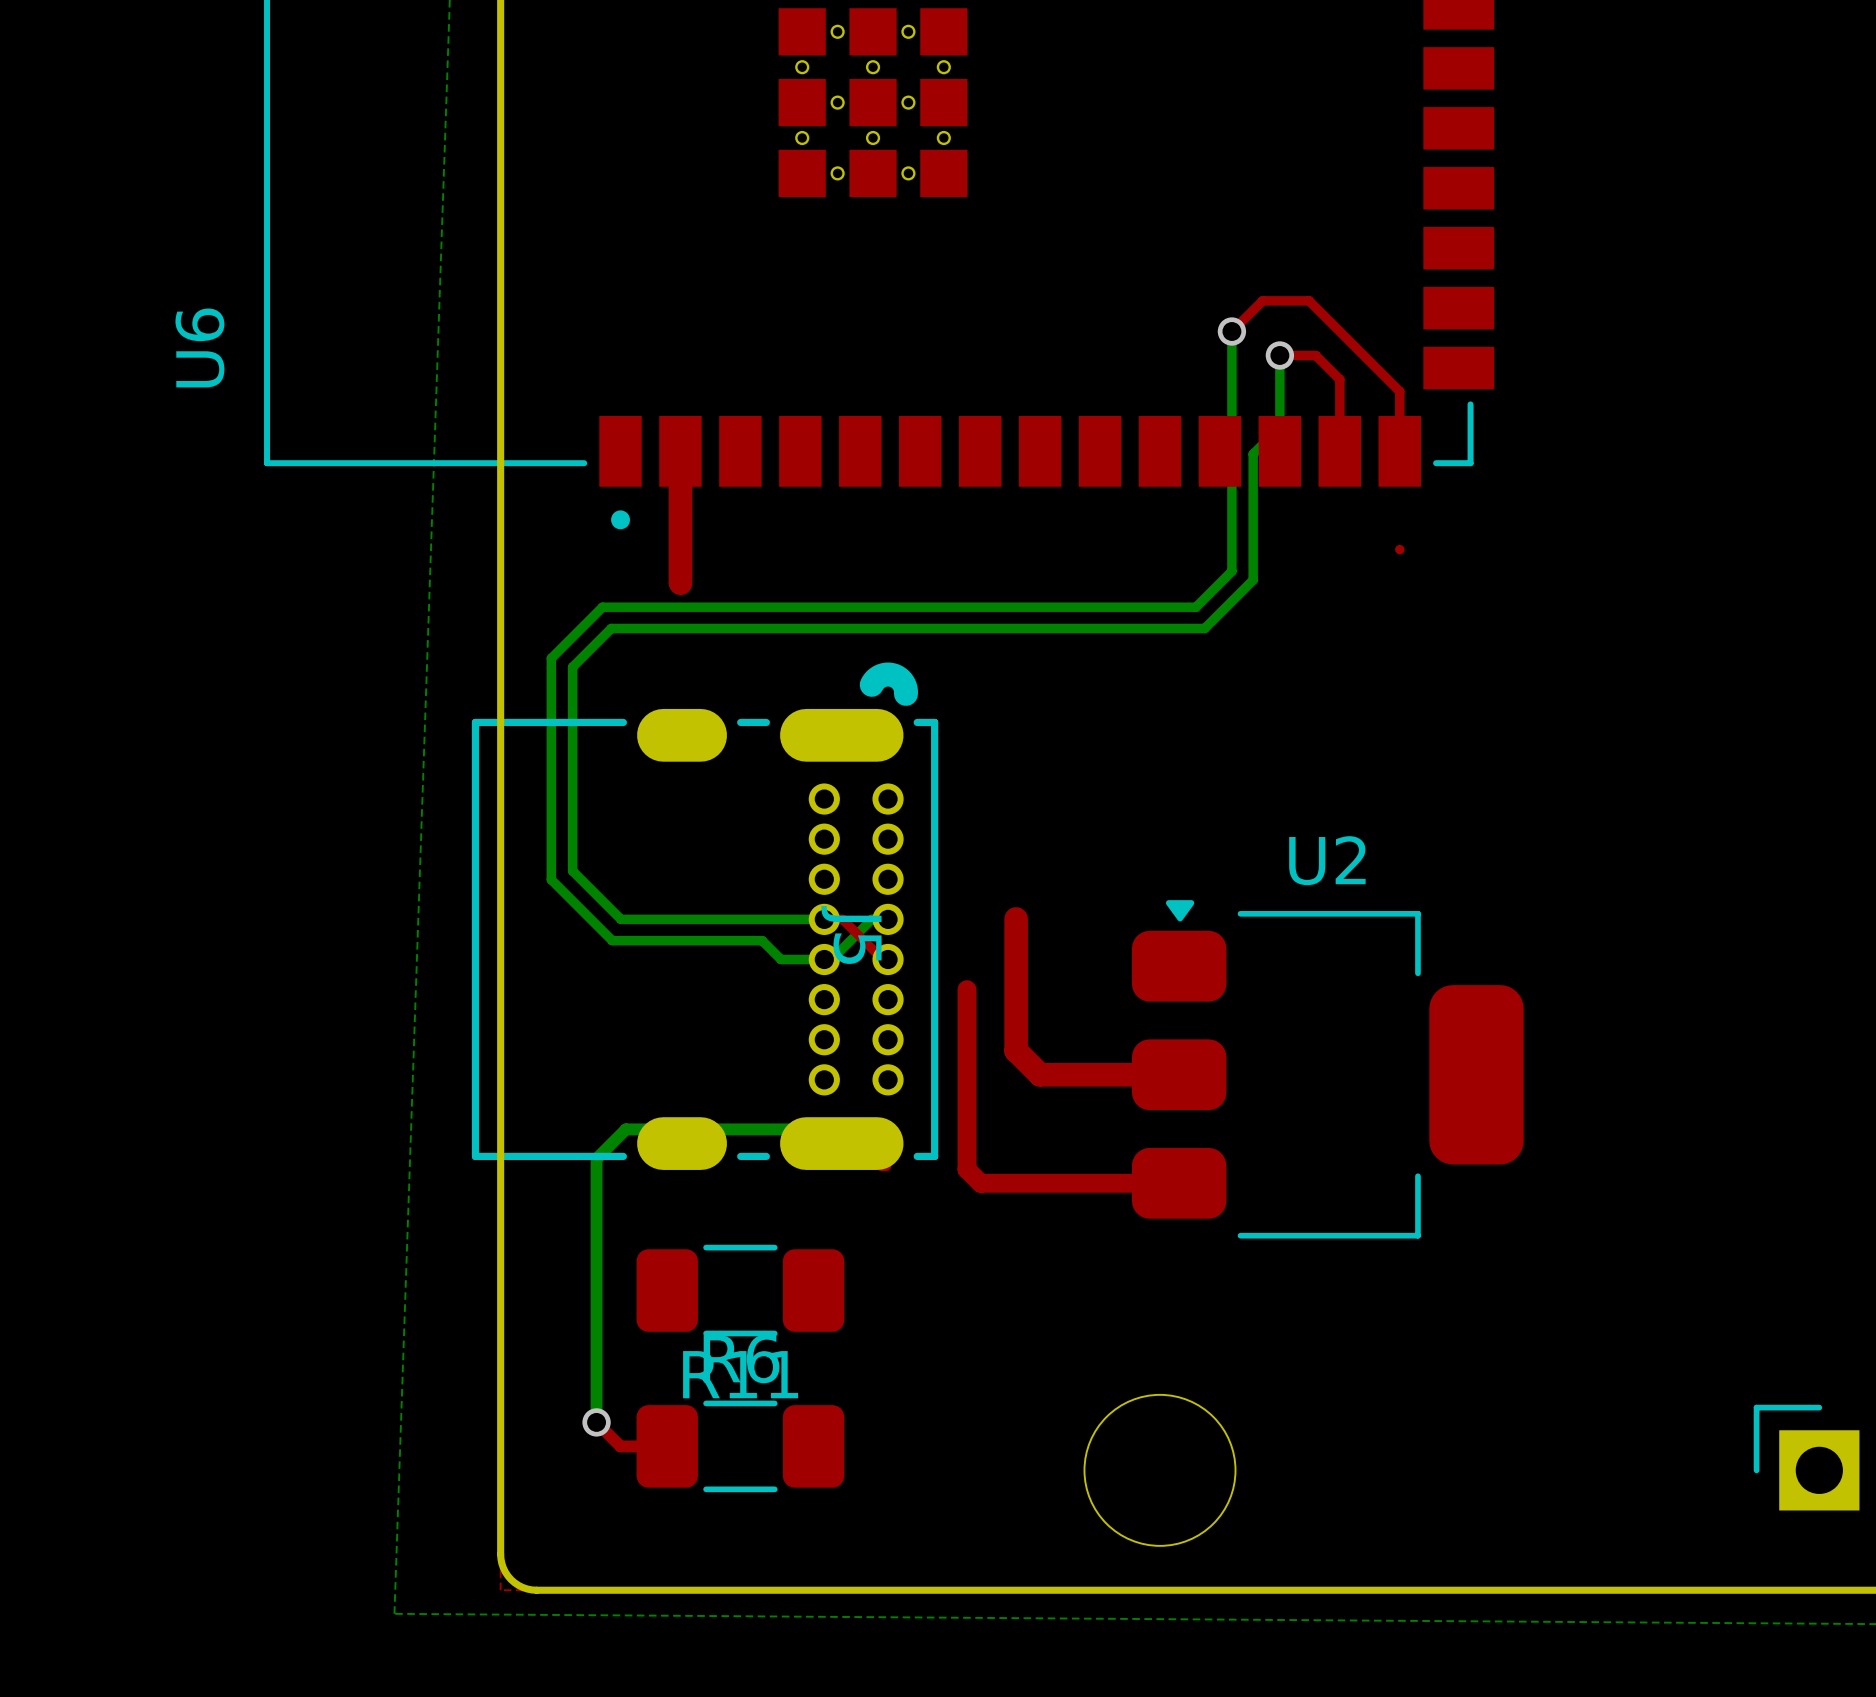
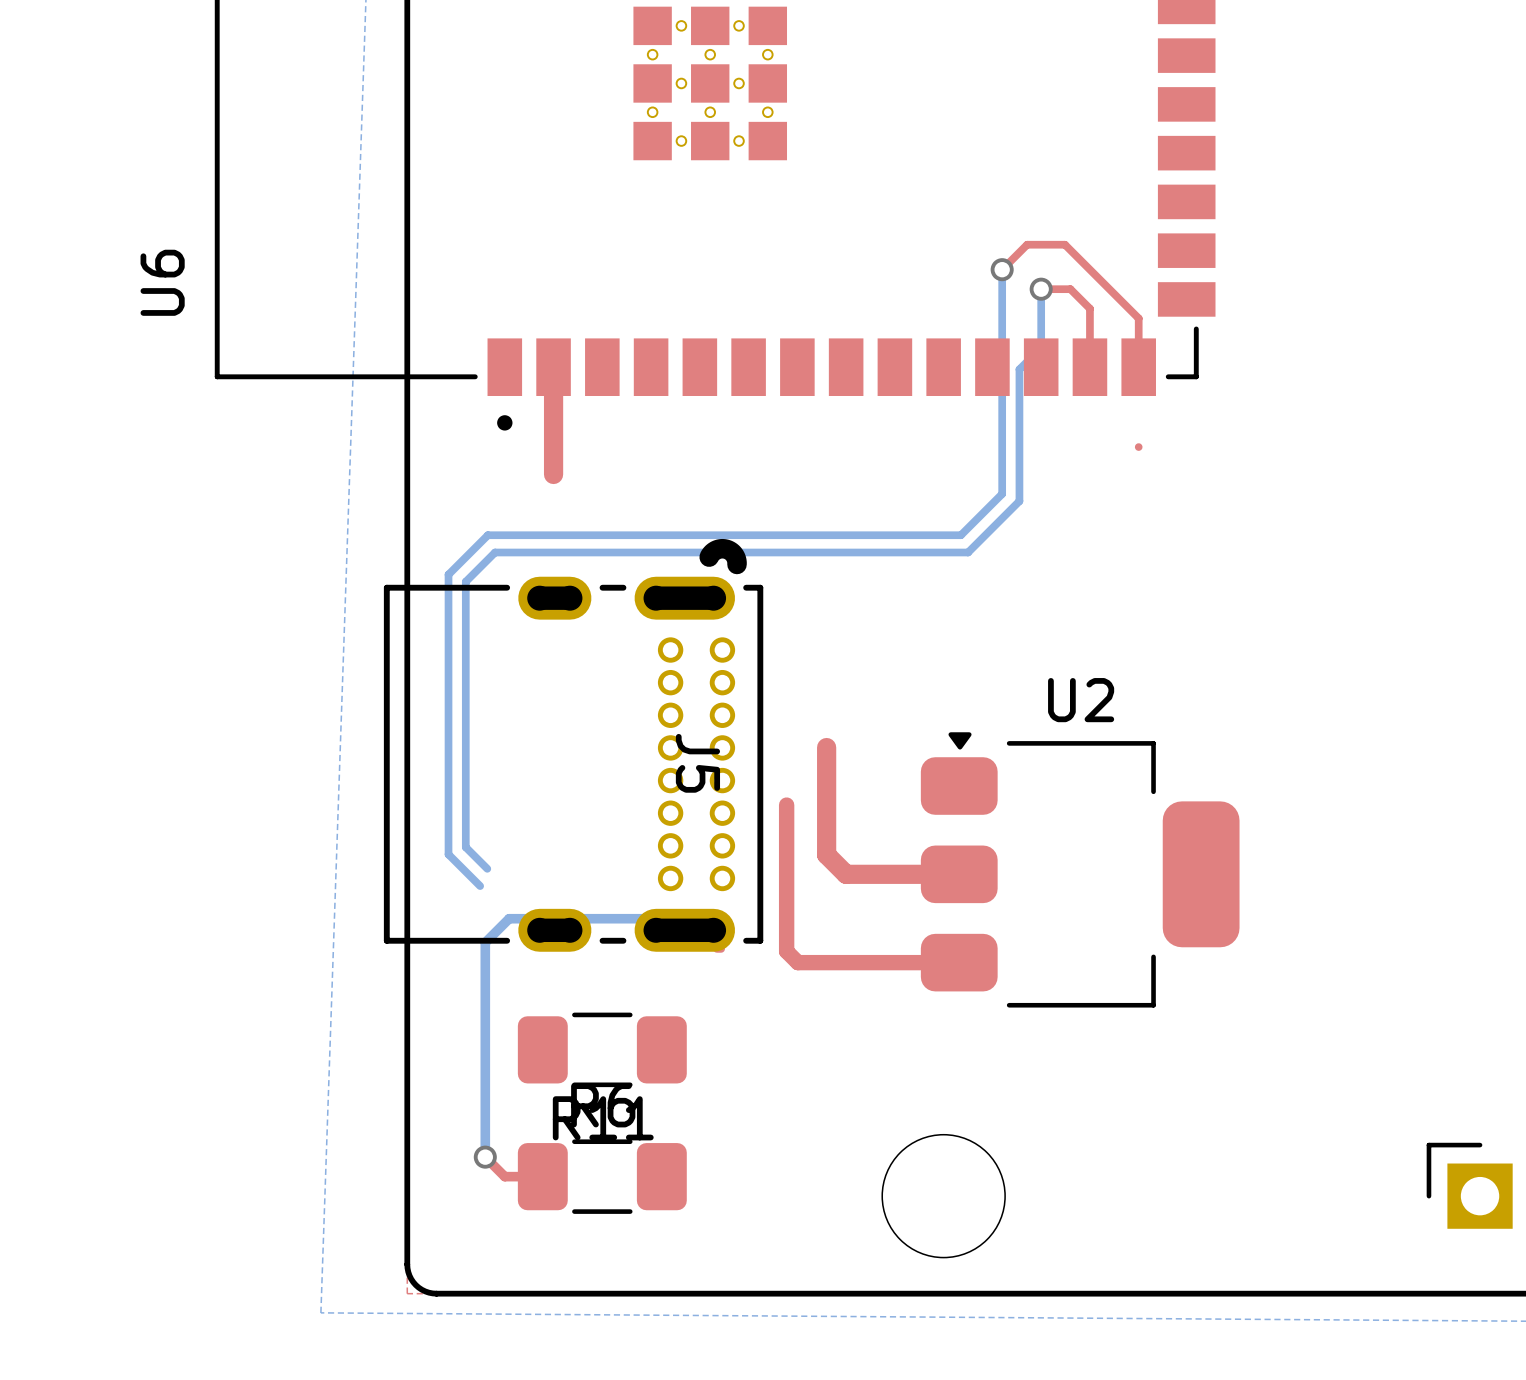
bottom track: (1231, 571) (1195, 607) (602, 607) (551, 658) (551, 706) -> (1002, 464) (1002, 493) (960, 535) (487, 535) (448, 574)
bottom track: (1253, 580) (1204, 628) (611, 628) (572, 667) (572, 715) -> (1019, 471) (1019, 501) (968, 552) (495, 552) (465, 581)
bottom track: (572, 870) (621, 919) (835, 919) -> (465, 708) (465, 847) (487, 868)
bottom track: (551, 879) (612, 940) (762, 940) (781, 959) (831, 959) (871, 919) (888, 919) -> (448, 715) (448, 854) (480, 886)
top track: (824, 919) (842, 919) (882, 959) (888, 959) -> none

